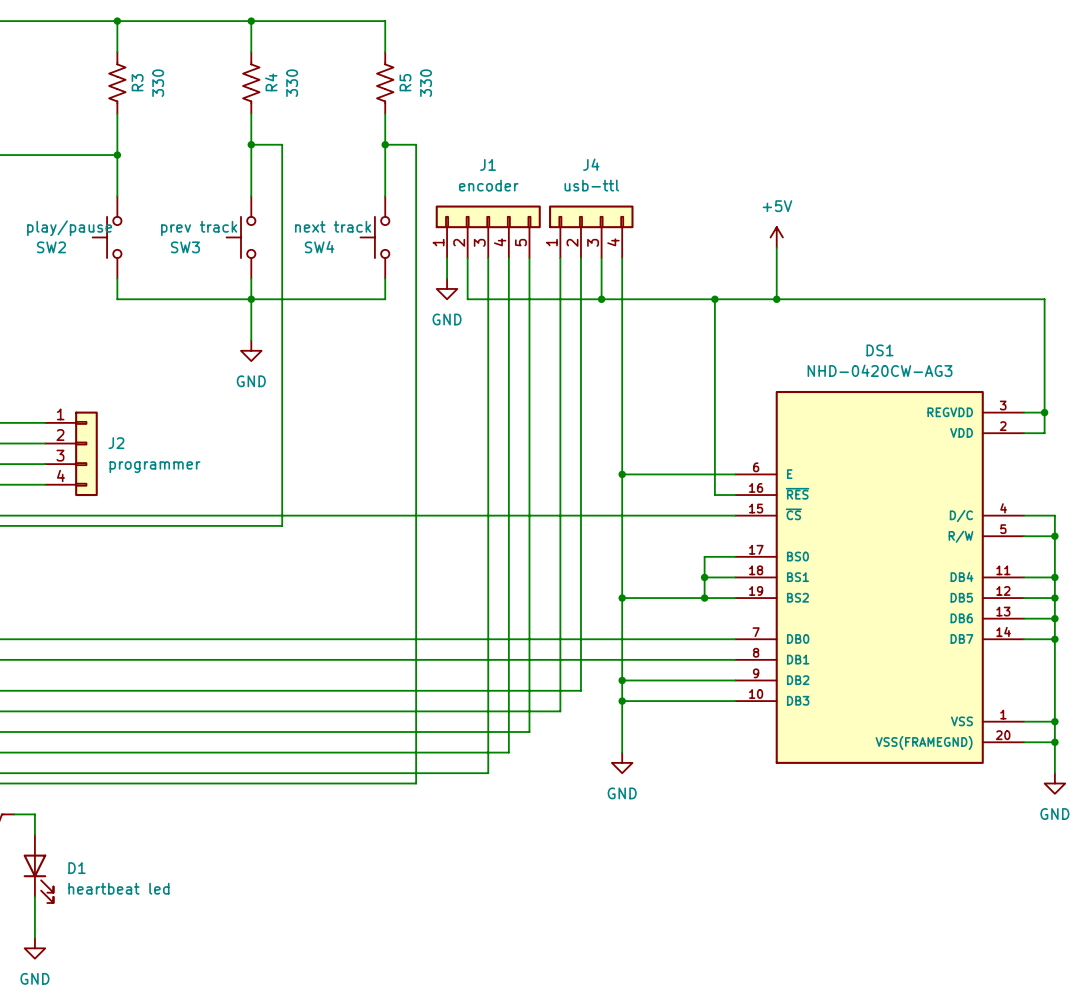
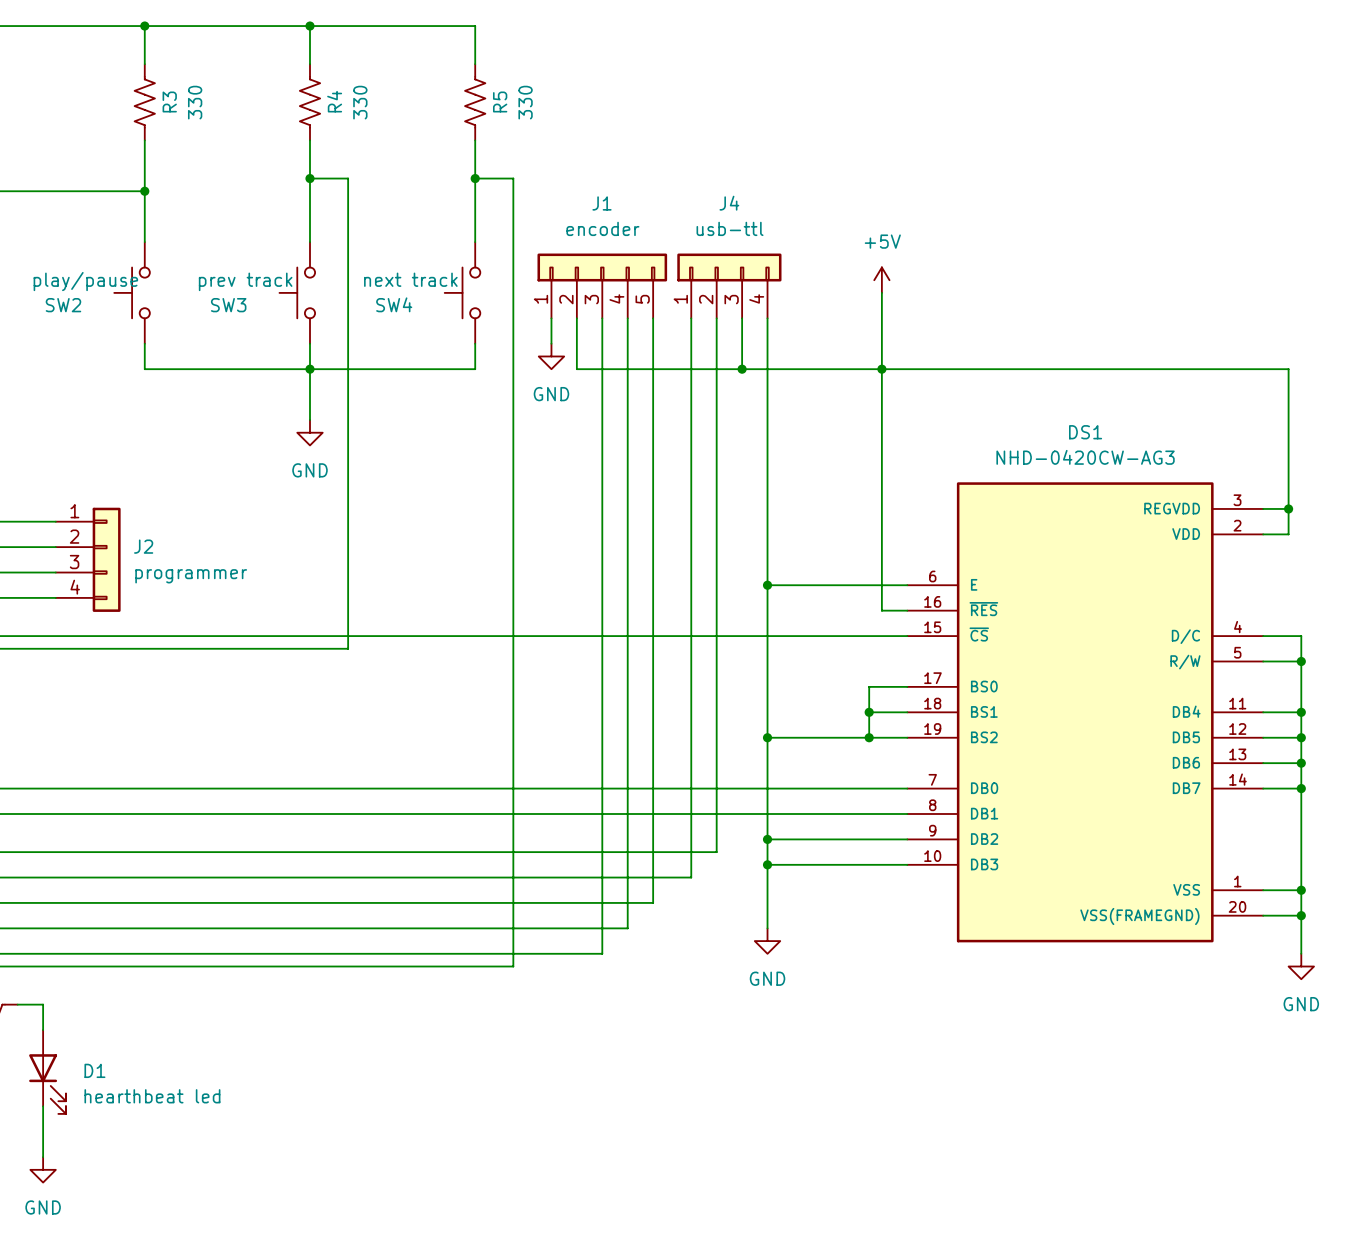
wire: none -> (881, 292) (881, 369)
power symbol position: +5V (776, 237) -> +5V (881, 280)
wire: (776, 247) (776, 299) -> none
junction: (776, 299) -> none
D1 value: heartbeat led (118, 888) -> hearthbeat led (152, 1096)

